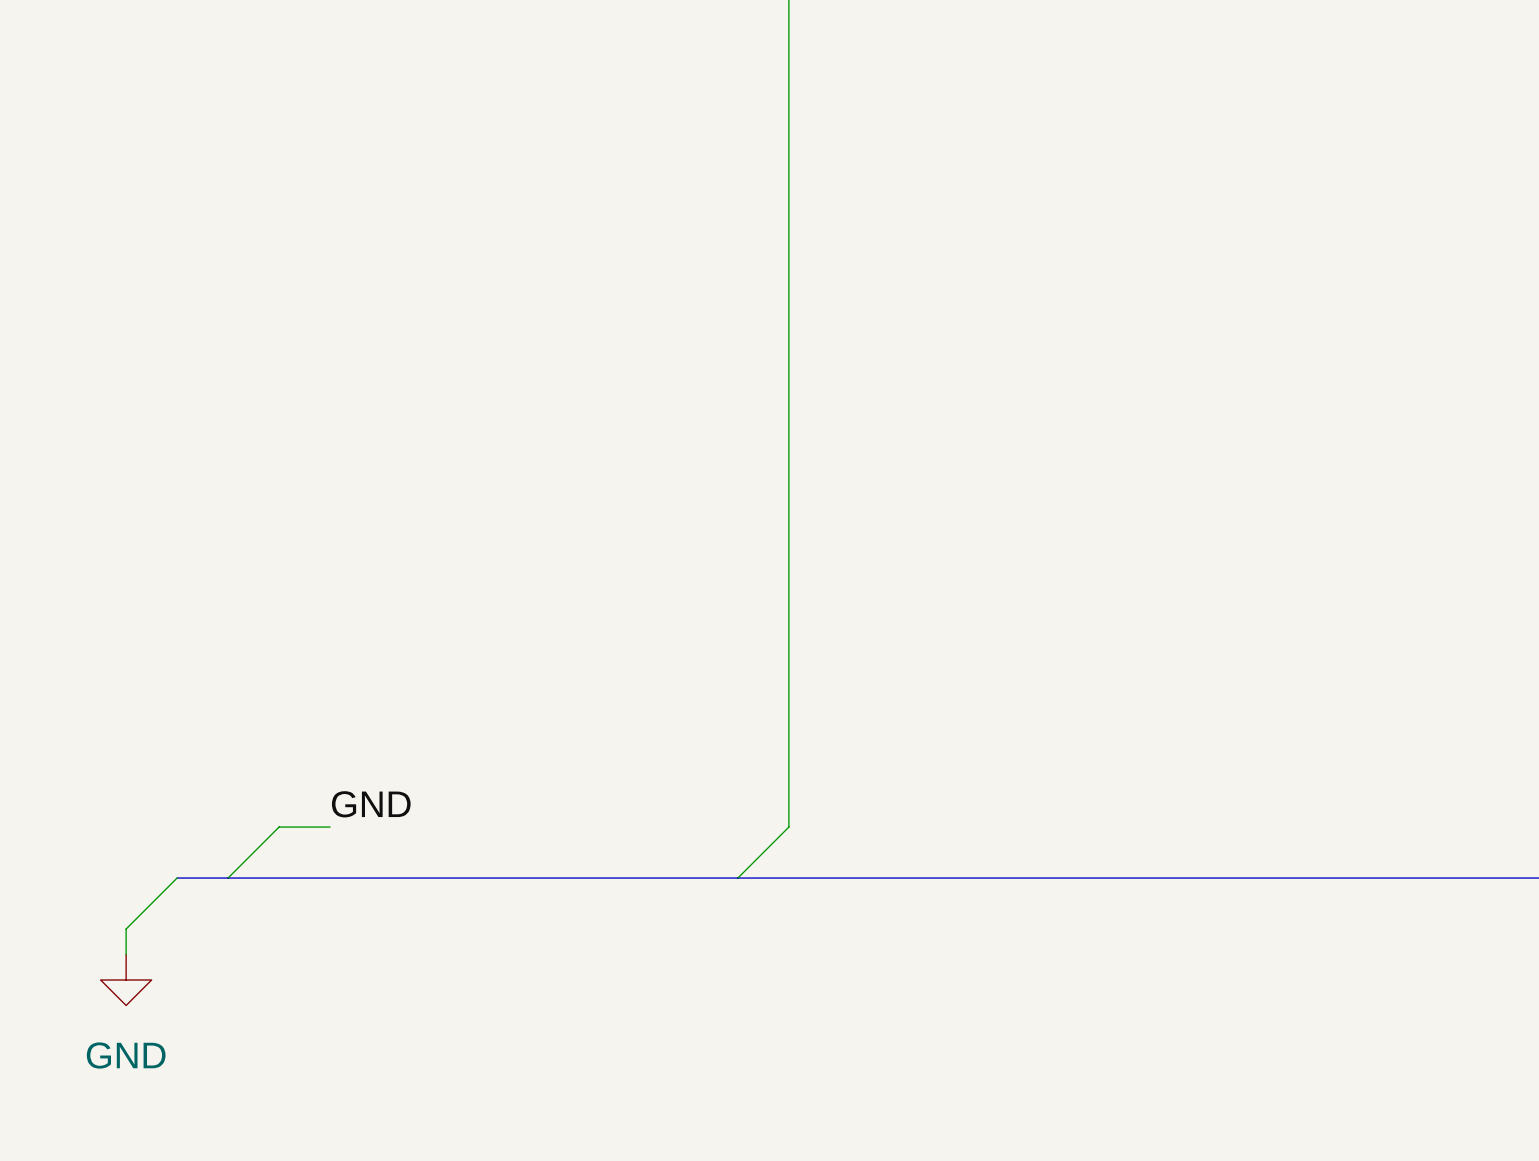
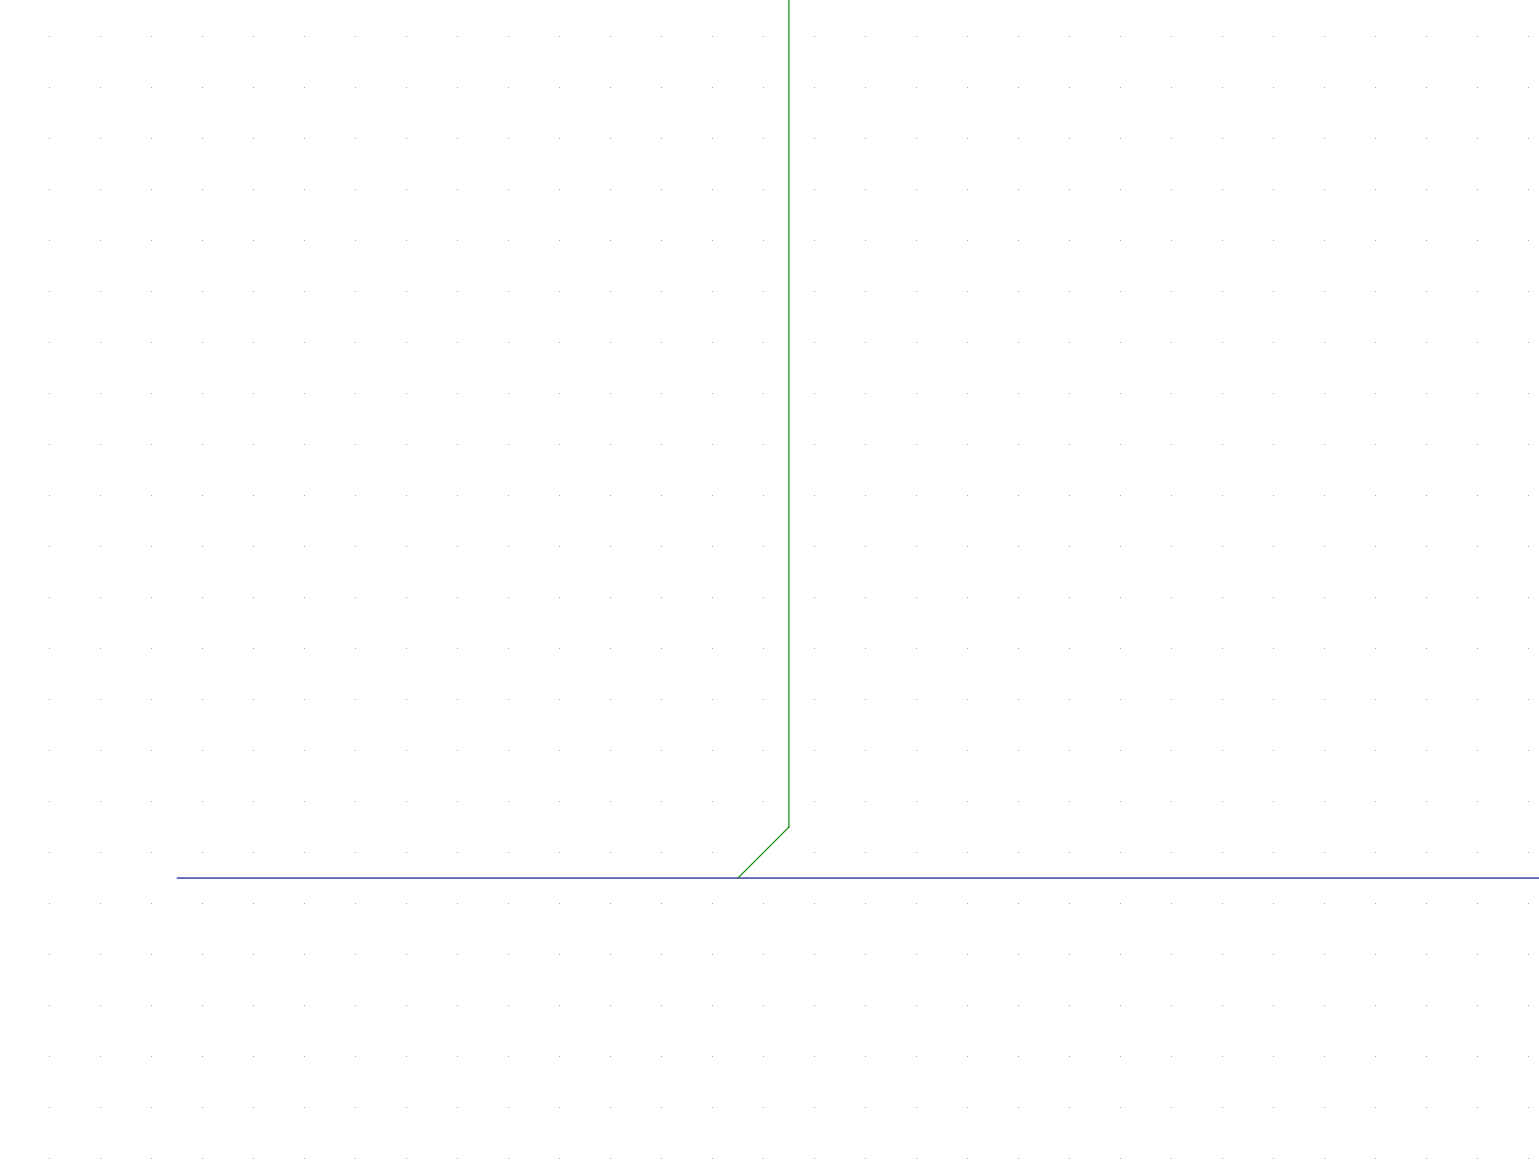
label: GND (371, 804) -> none
wire: (330, 827) (279, 827) (228, 878) -> none
wire: (177, 878) (126, 929) (126, 954) -> none
power symbol: GND (126, 980) -> none

